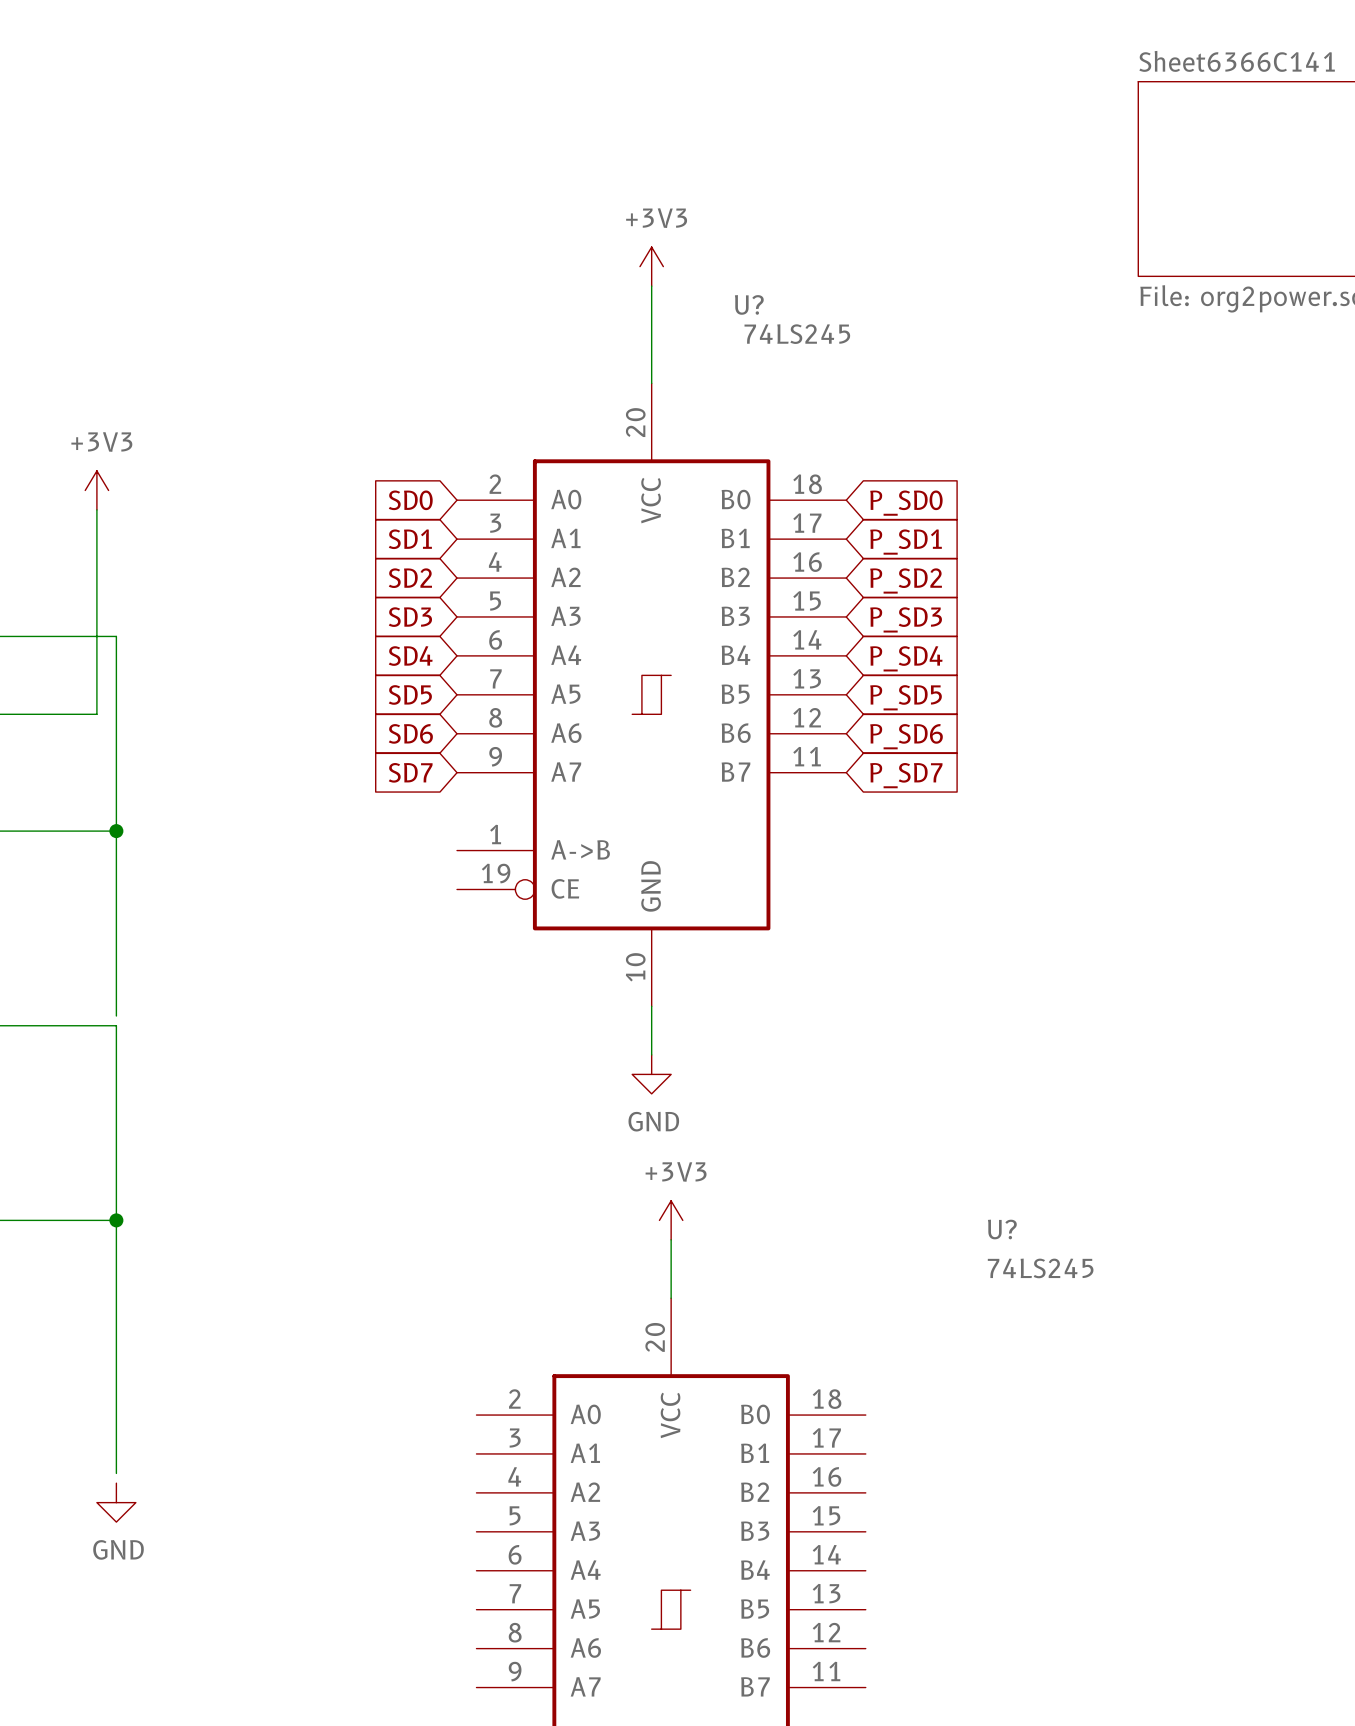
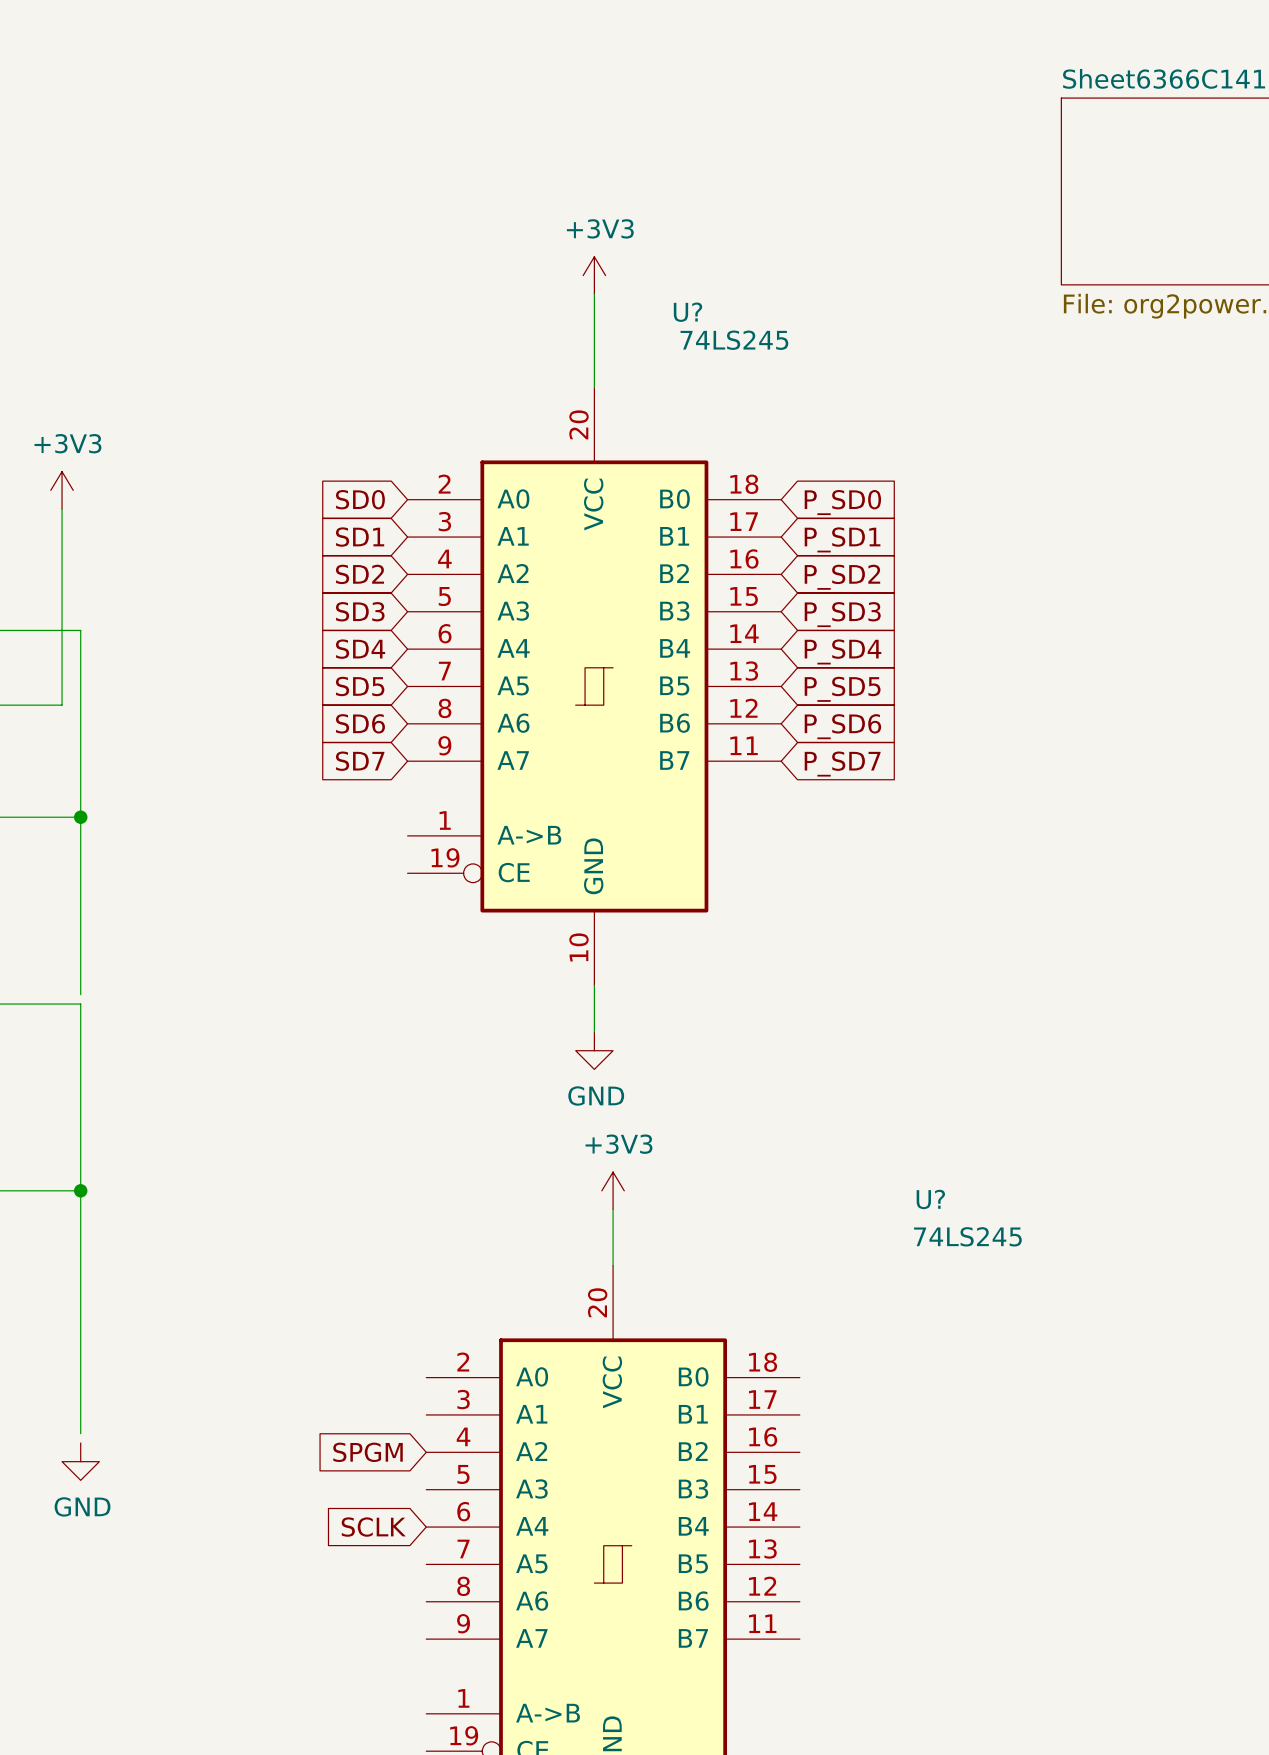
global label: none -> SPGM (368, 1452)
global label: none -> SCLK (373, 1527)

